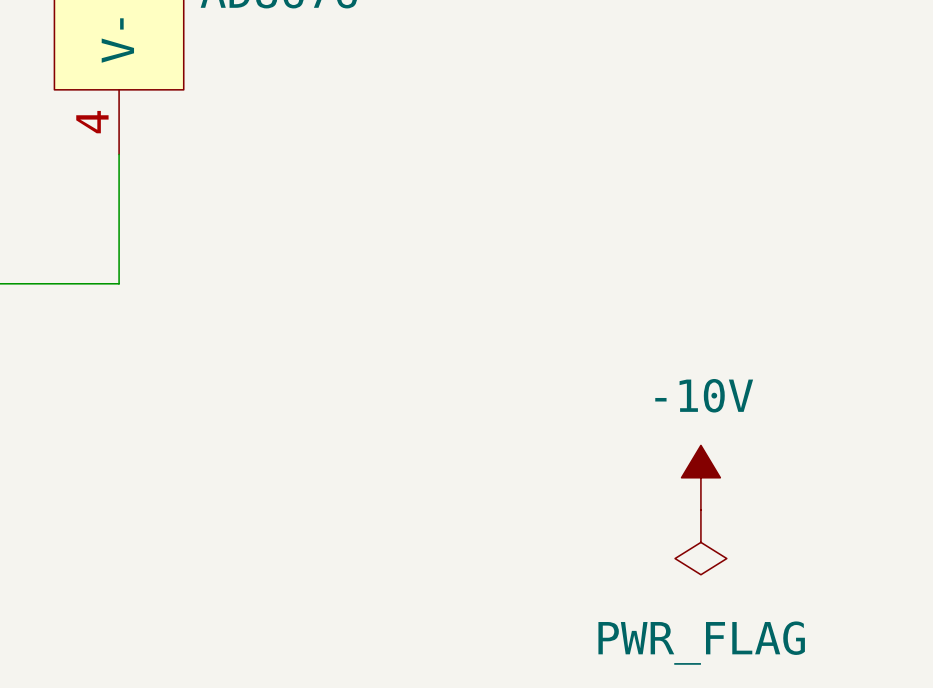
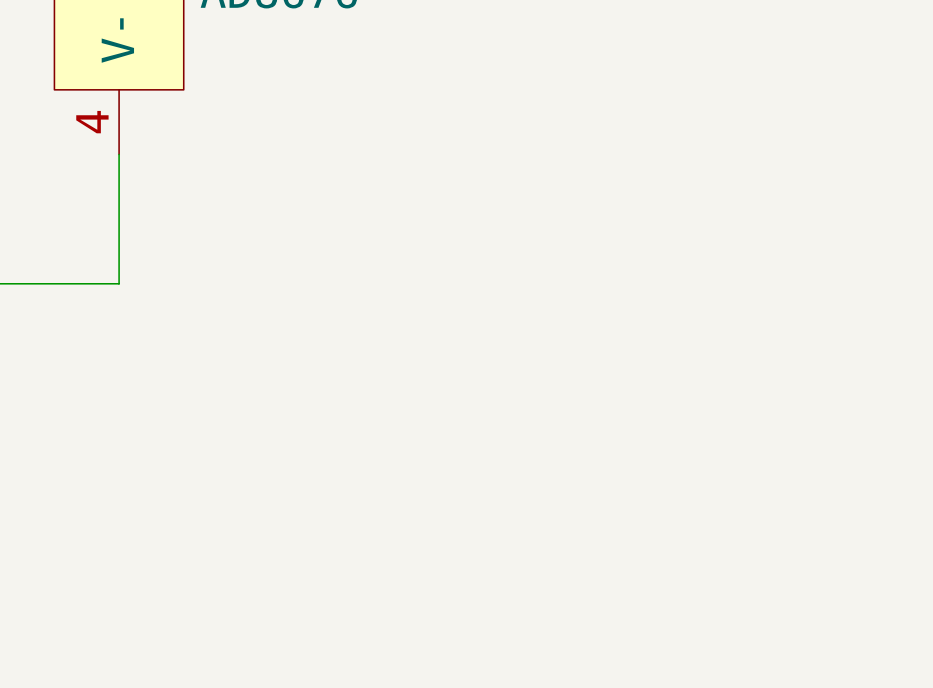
power symbol: -10V (700, 477) -> none
power symbol: PWR_FLAG (700, 542) -> none

